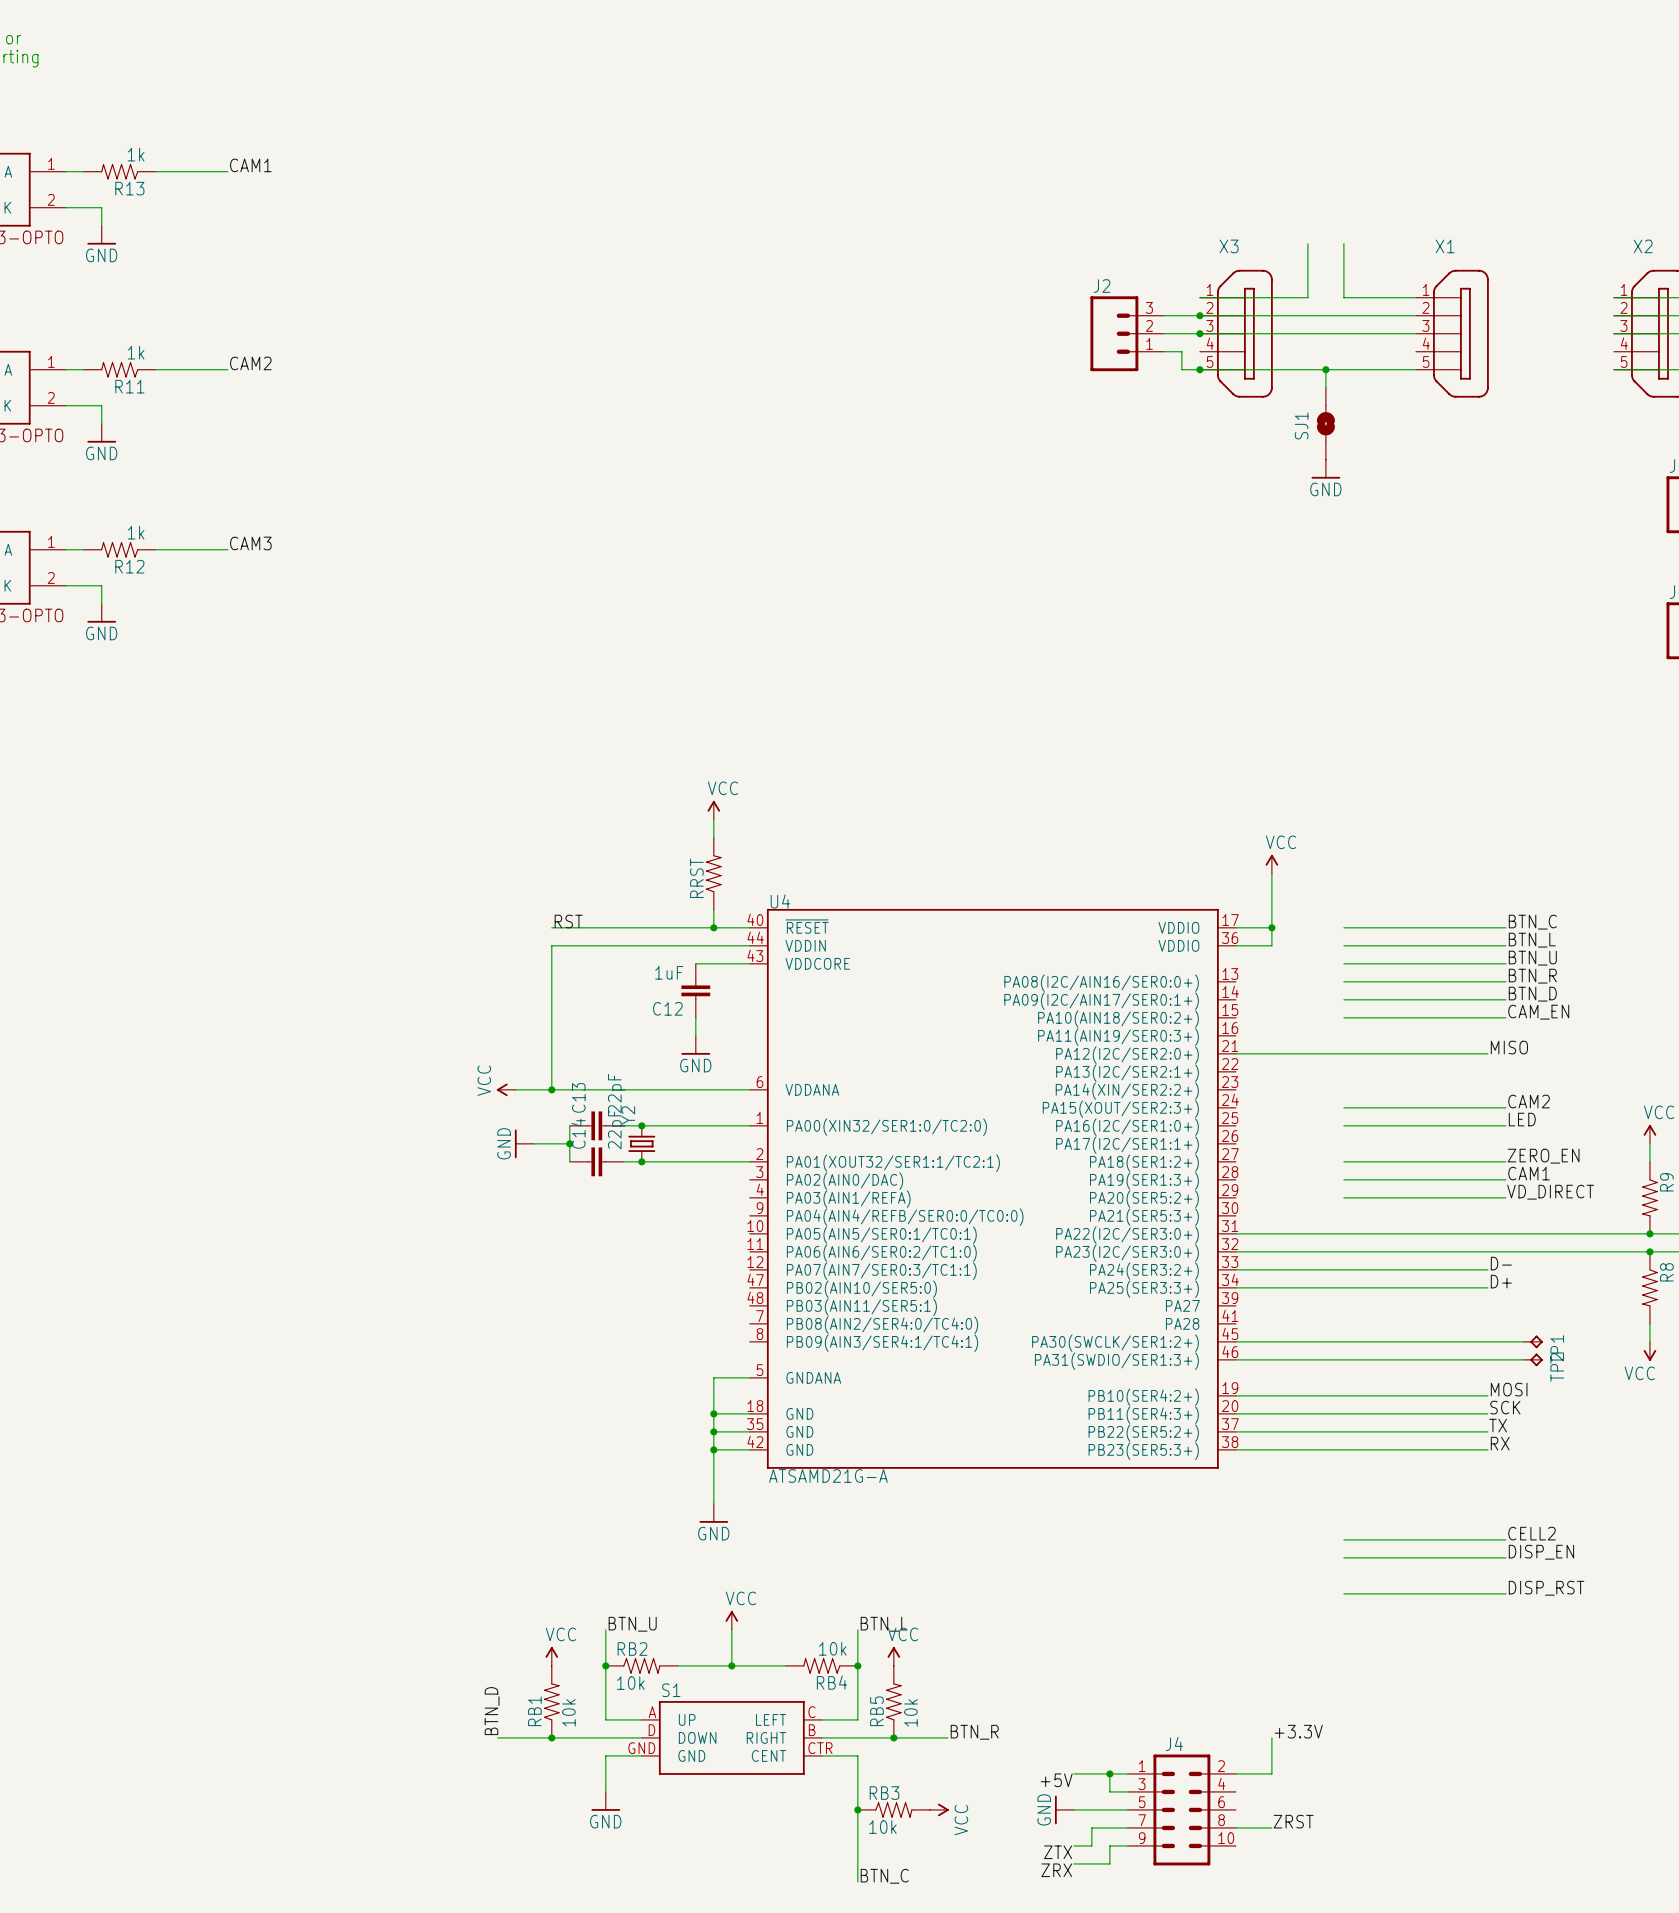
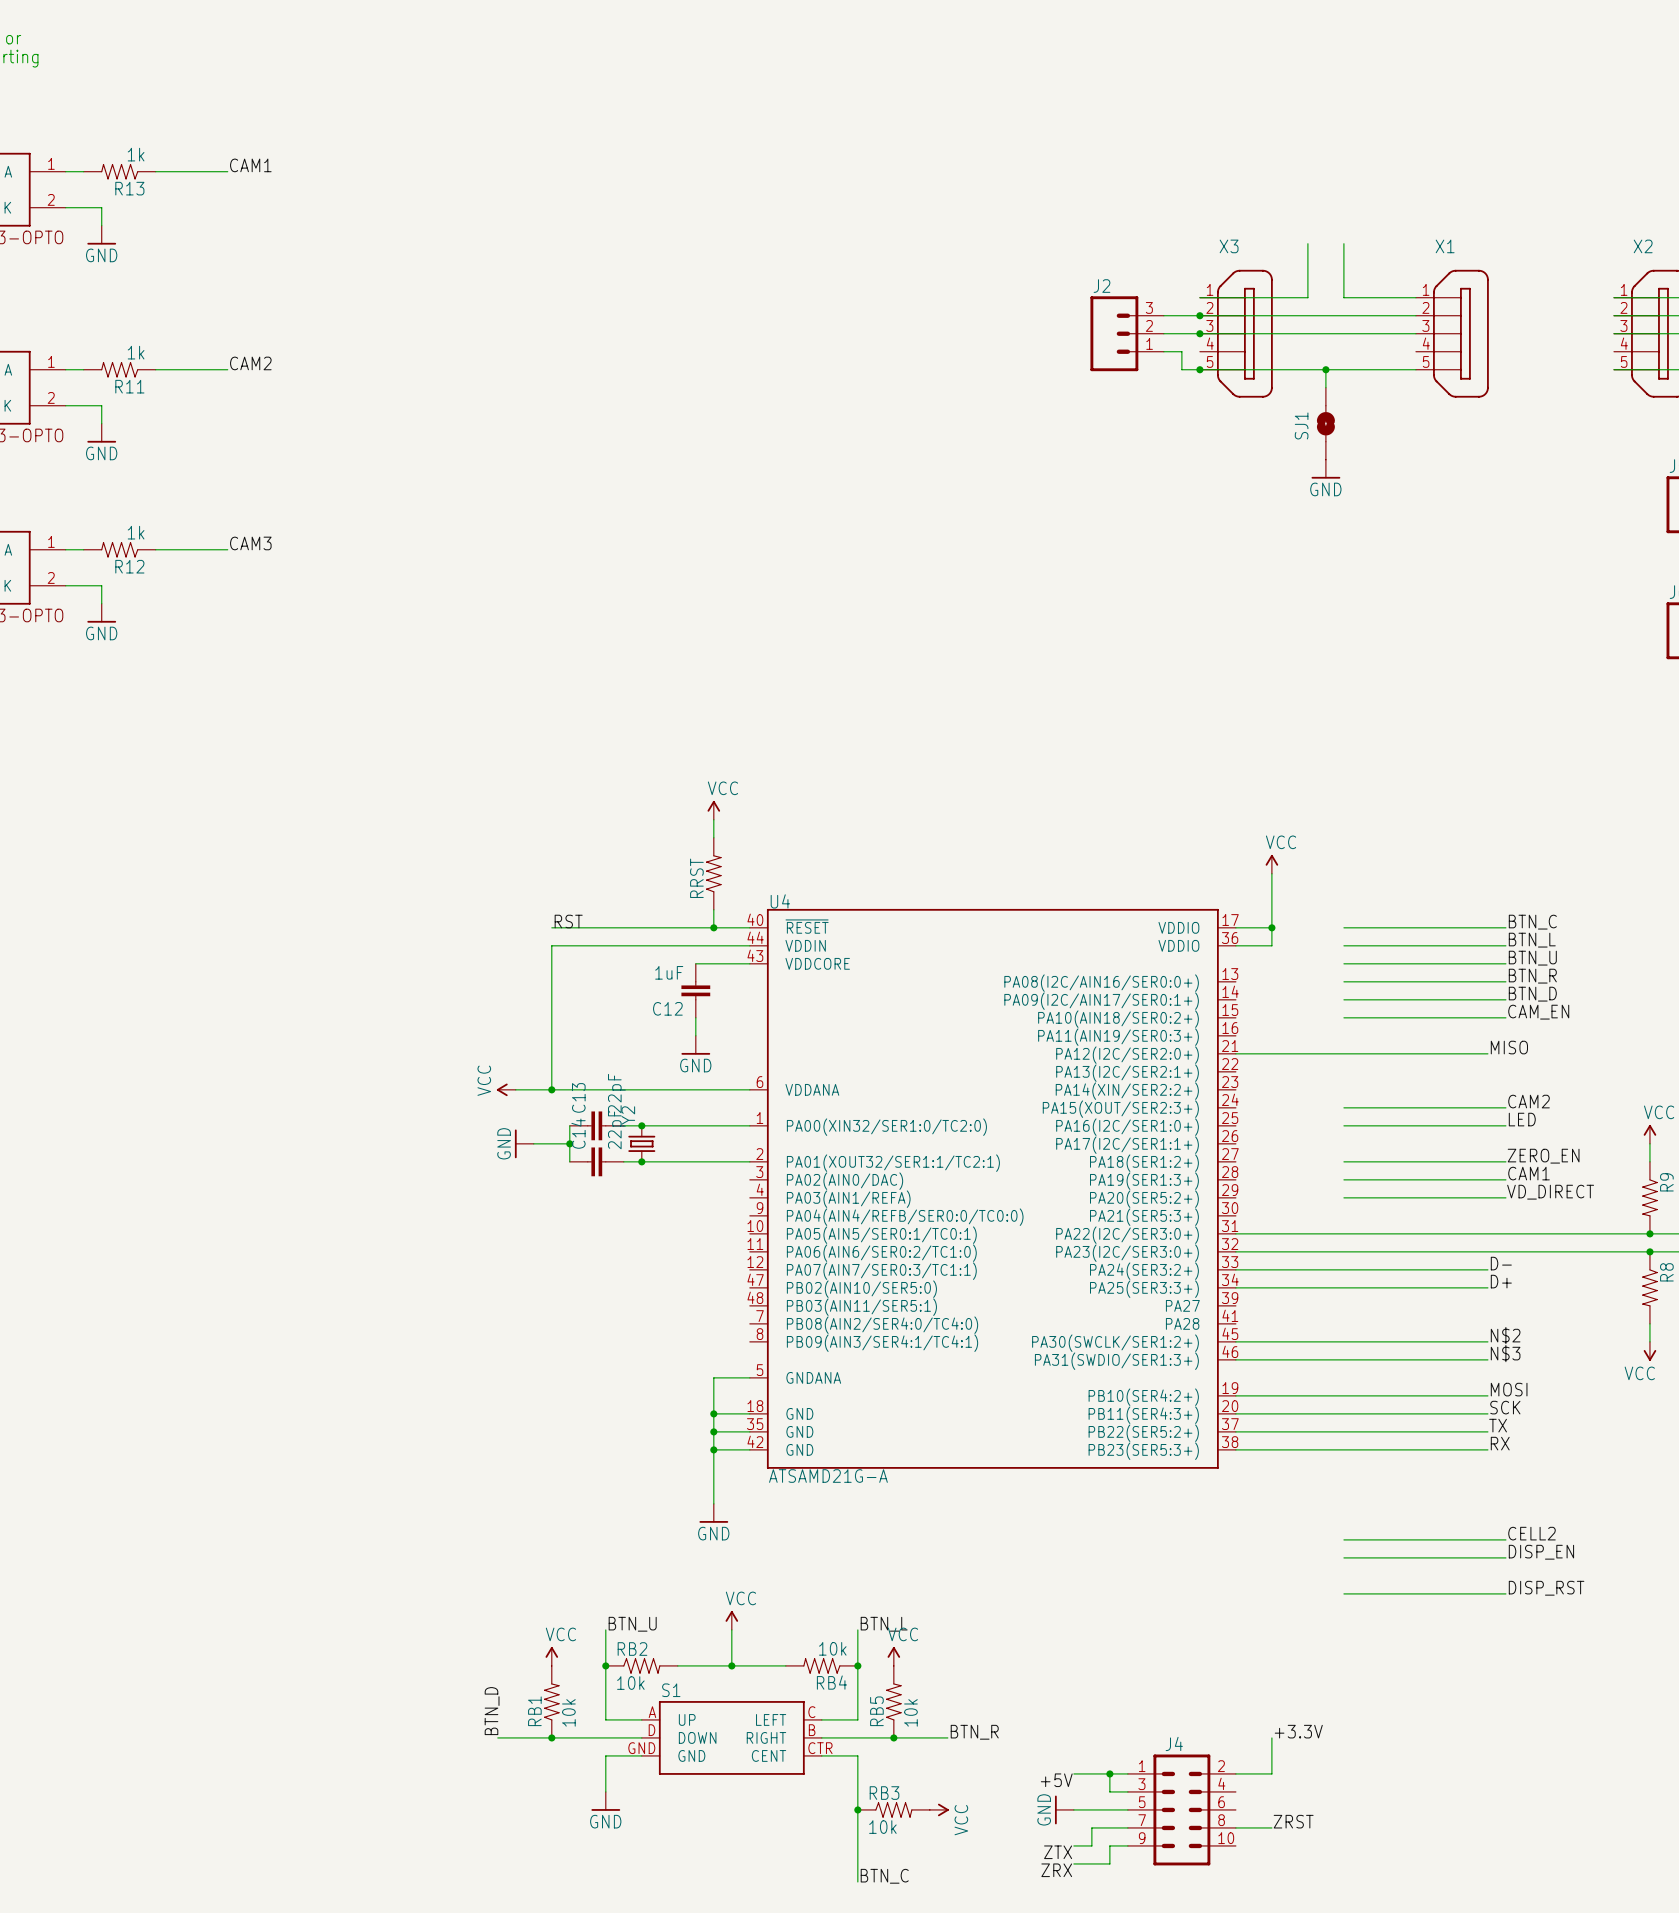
label: none -> N$2 (1505, 1335)
wire: (1487, 1341) (1523, 1341) -> none
TP1: (1533, 1341) -> none
label: none -> N$3 (1505, 1353)
wire: (1487, 1359) (1523, 1359) -> none
TP2: (1533, 1359) -> none

